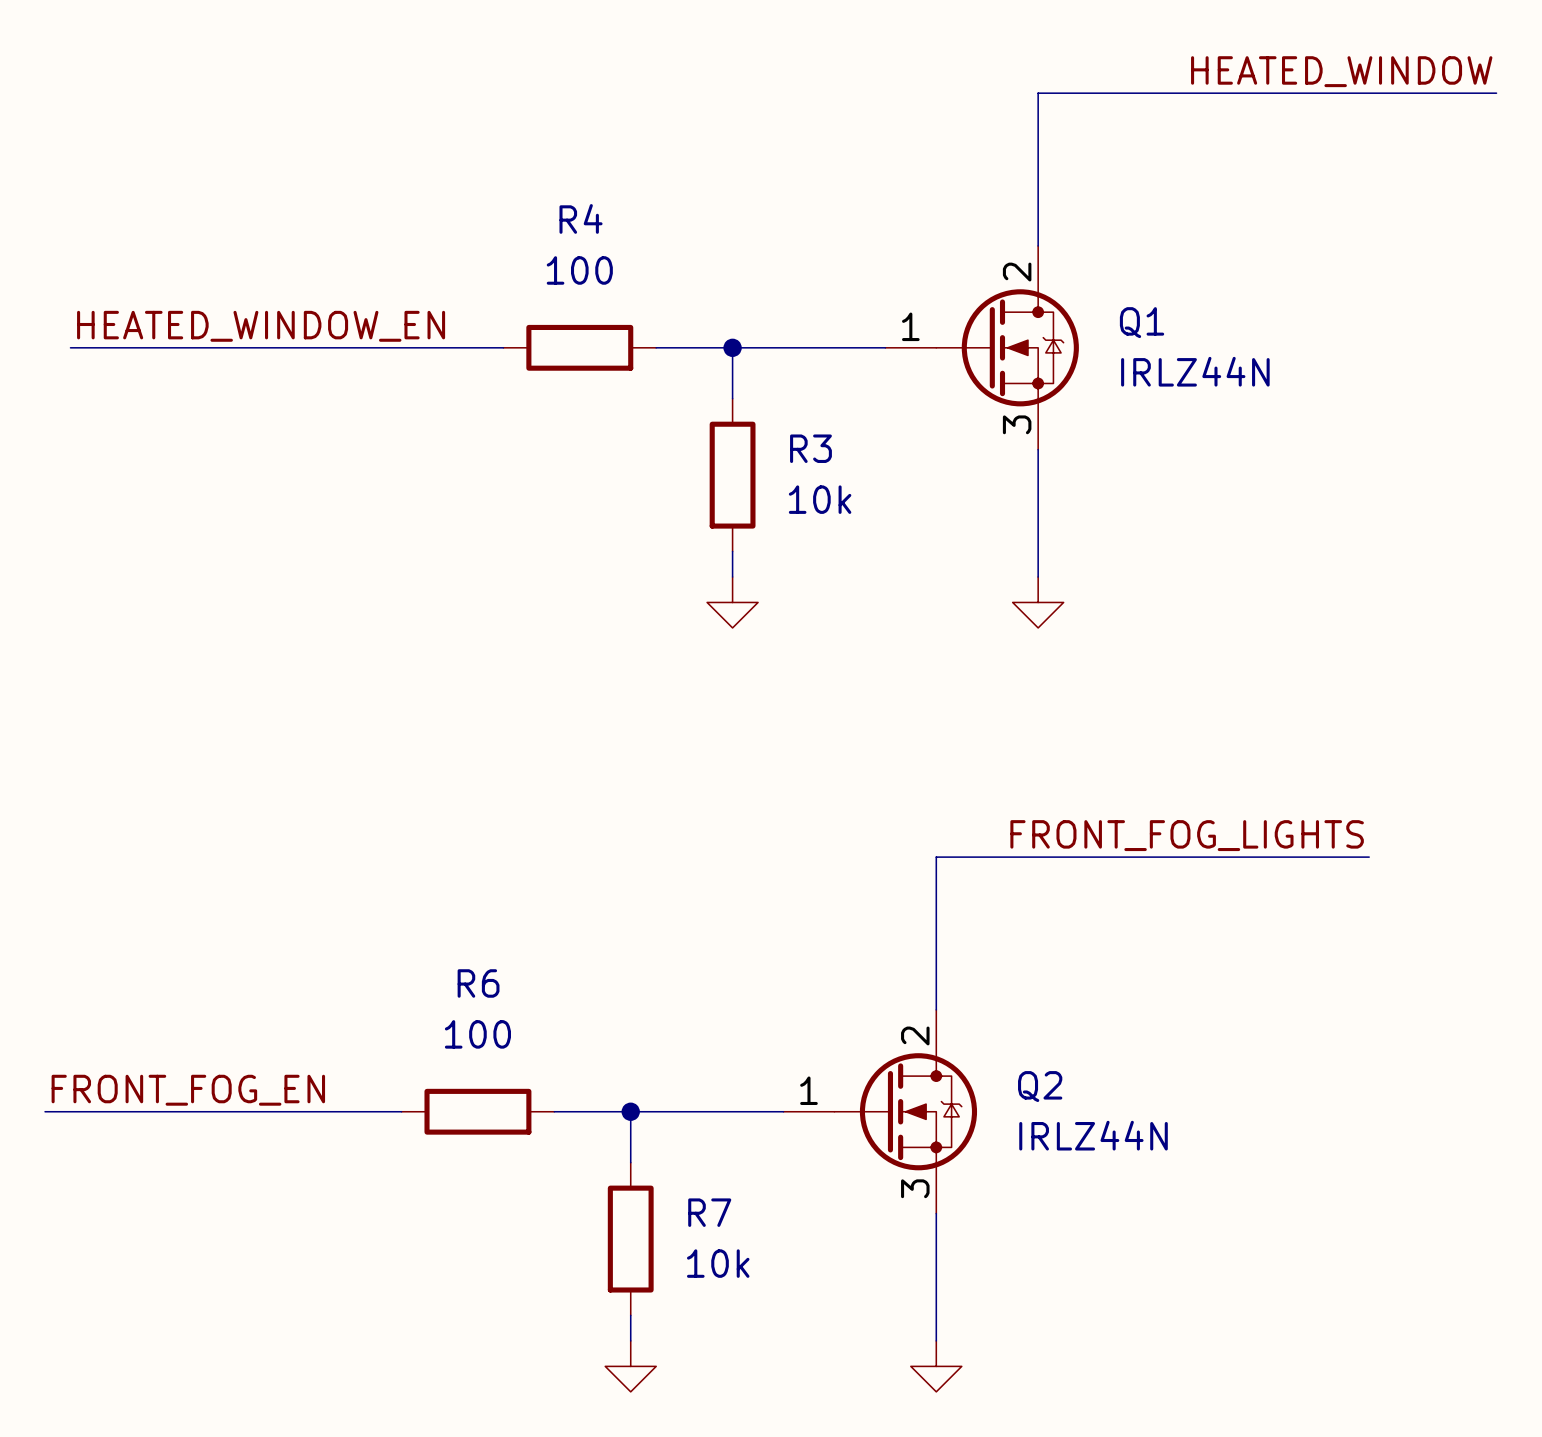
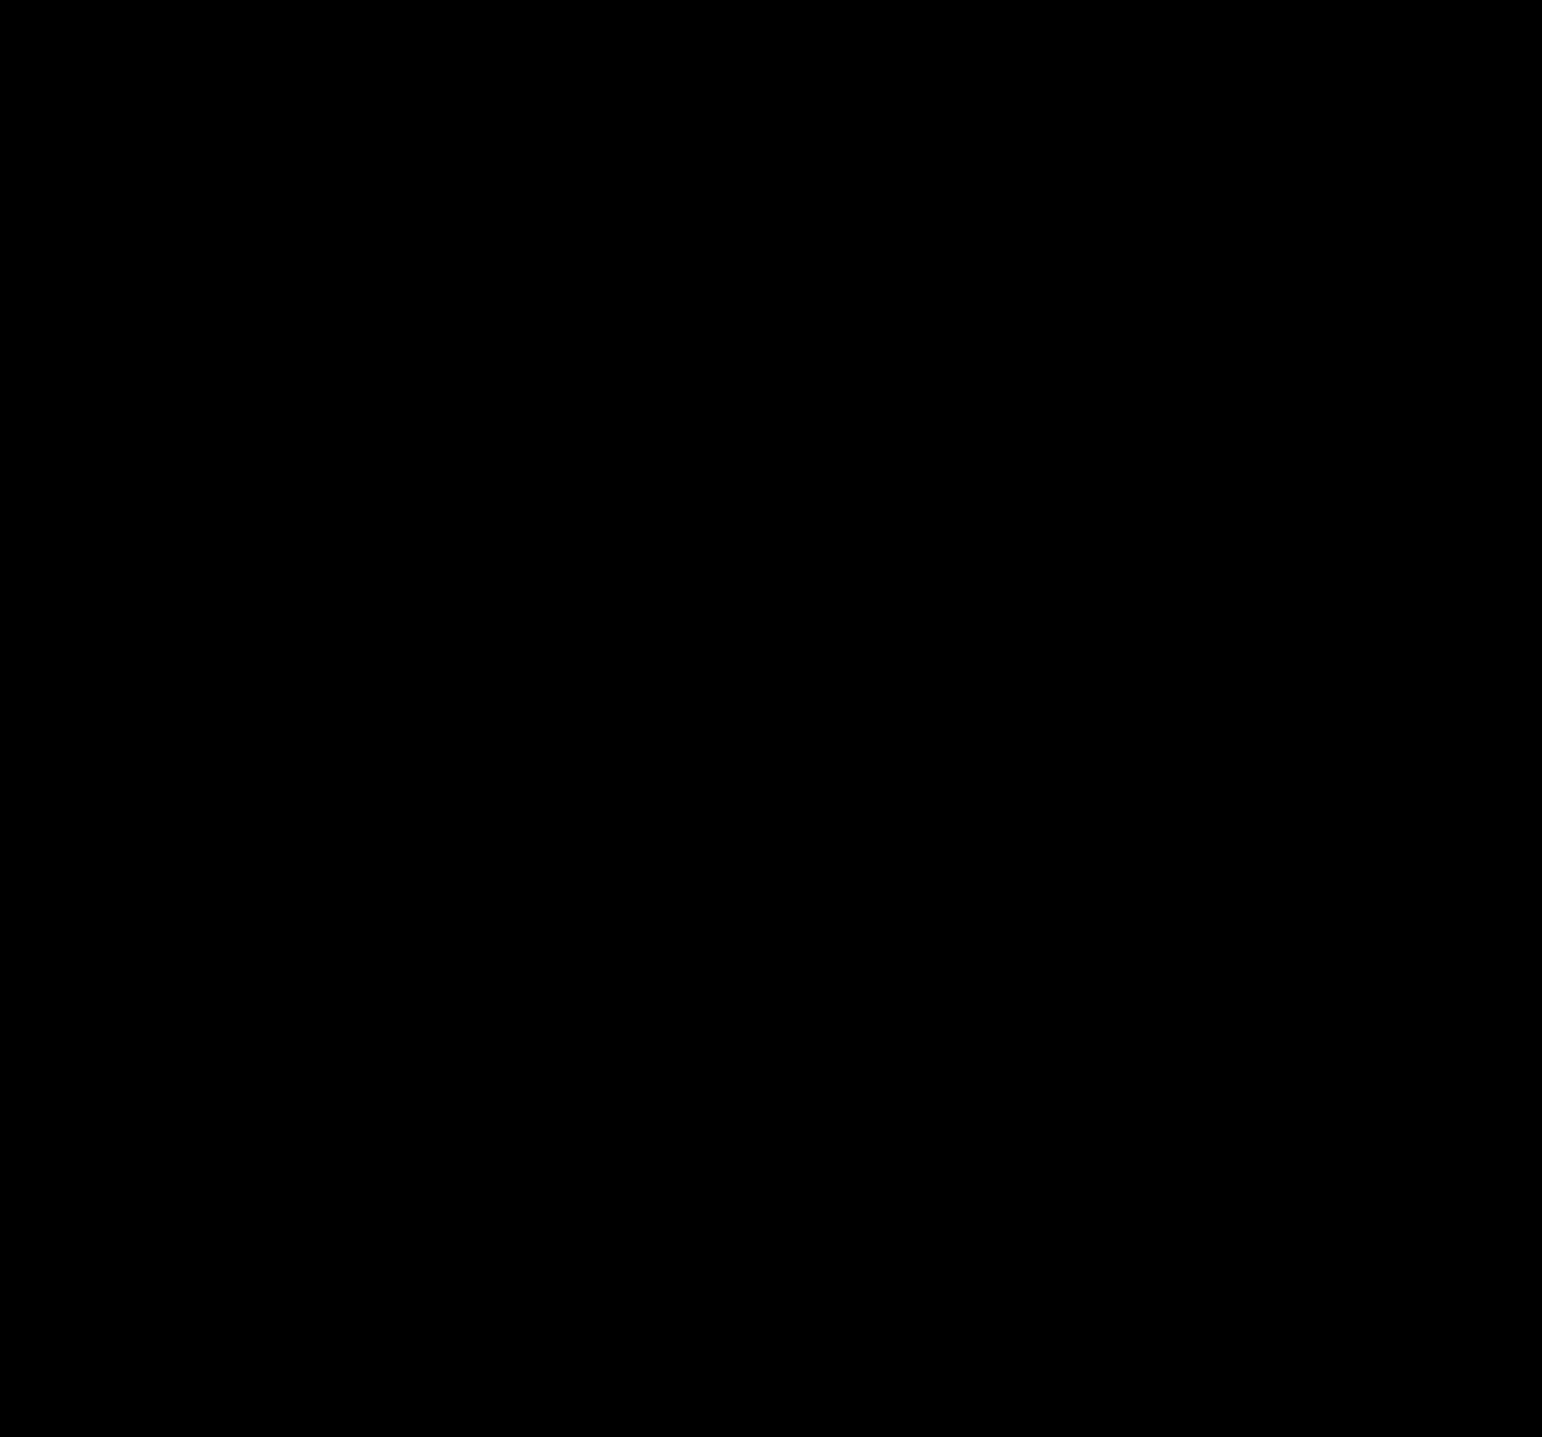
label: HEATED_WINDOW (1341, 71) -> none
wire: (1496, 93) (1038, 93) (1038, 245) -> none
label: HEATED_WINDOW_EN (261, 326) -> none
wire: (70, 347) (503, 347) -> none
R4: 100 (579, 347) -> none
wire: (656, 347) (885, 347) -> none
wire: (732, 347) (732, 398) -> none
junction: (732, 347) -> none
Q1: IRLZ44N (982, 347) -> none
wire: (1038, 449) (1038, 577) -> none
R3: 10k (732, 475) -> none
wire: (732, 551) (732, 577) -> none
power symbol: (732, 602) -> none
power symbol: (1038, 602) -> none
label: FRONT_FOG_LIGHTS (1187, 835) -> none
wire: (1369, 857) (936, 857) (936, 1009) -> none
label: FRONT_FOG_EN (188, 1090) -> none
wire: (45, 1111) (401, 1111) -> none
R6: 100 (477, 1111) -> none
wire: (554, 1111) (783, 1111) -> none
wire: (630, 1111) (630, 1162) -> none
junction: (630, 1111) -> none
Q2: IRLZ44N (880, 1111) -> none
wire: (936, 1213) (936, 1340) -> none
R7: 10k (630, 1239) -> none
wire: (630, 1315) (630, 1340) -> none
power symbol: (630, 1366) -> none
power symbol: (936, 1366) -> none

